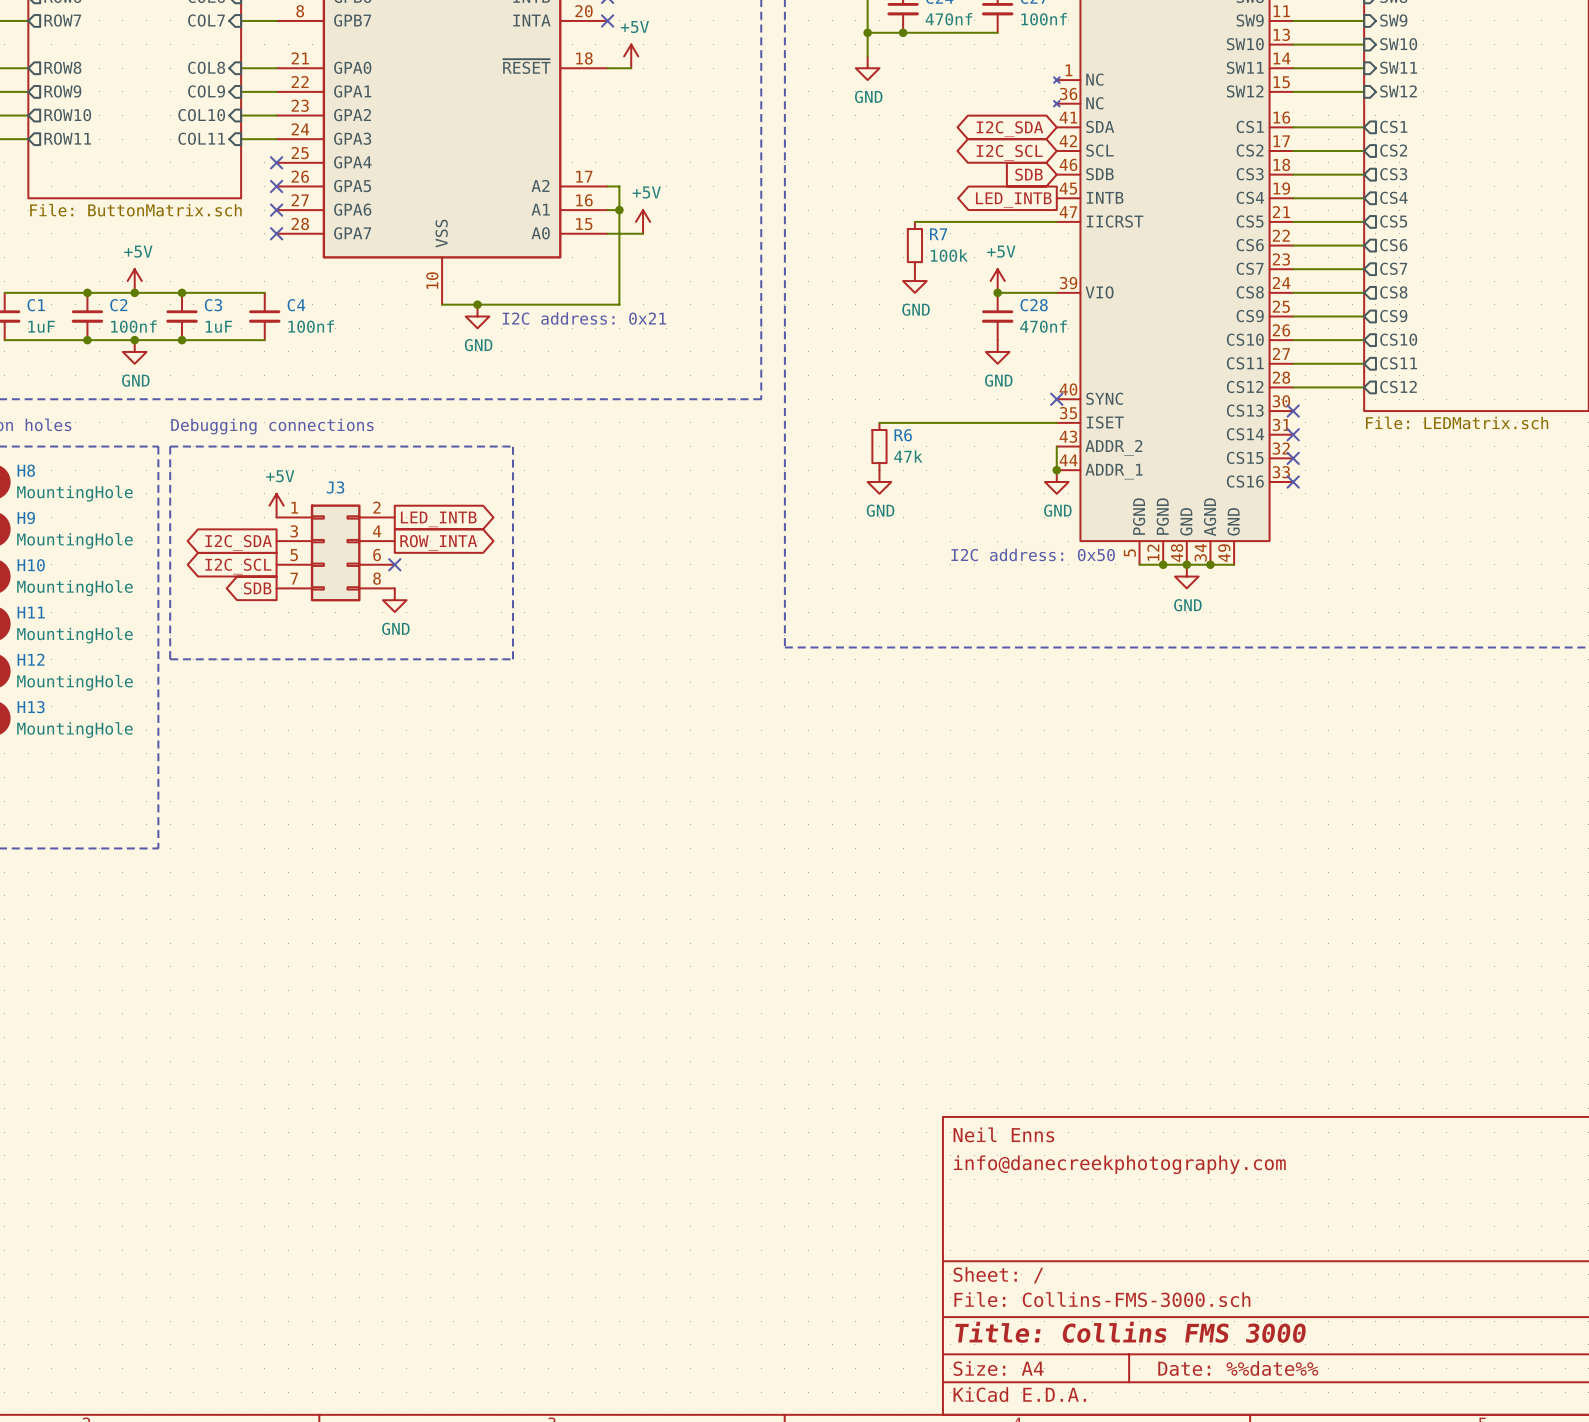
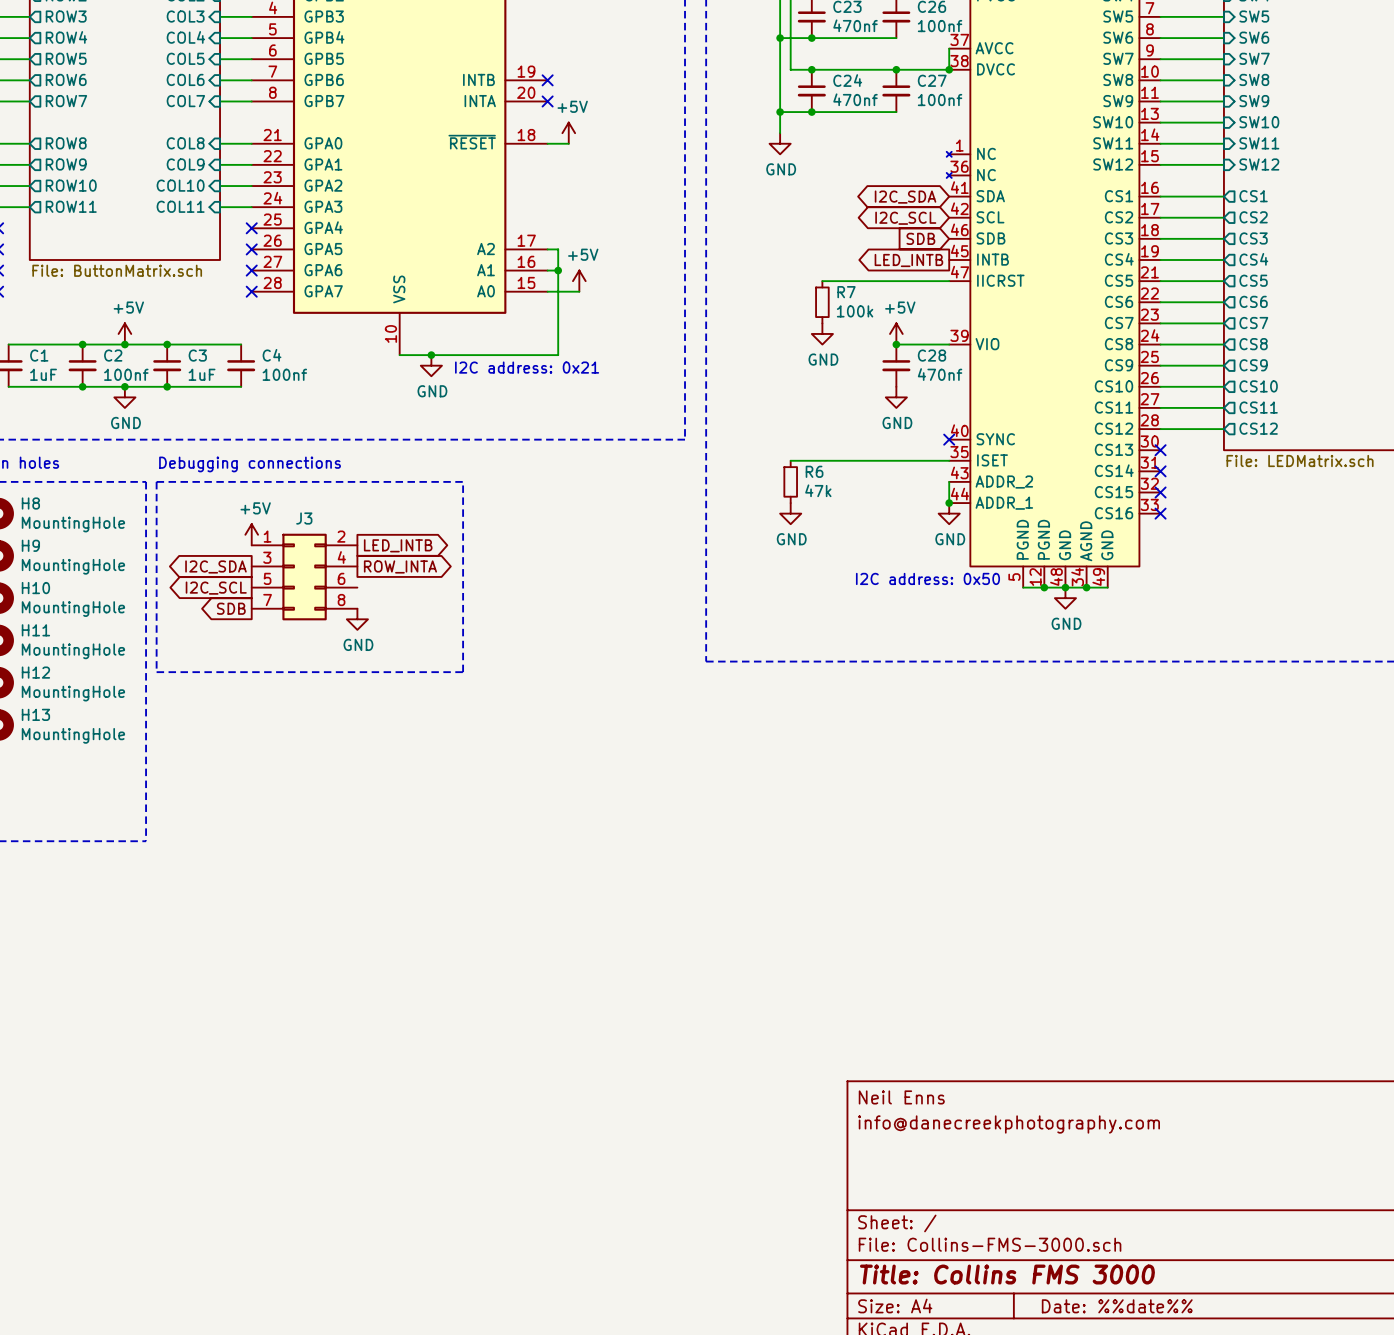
no-connect mark: (394, 564) -> none

